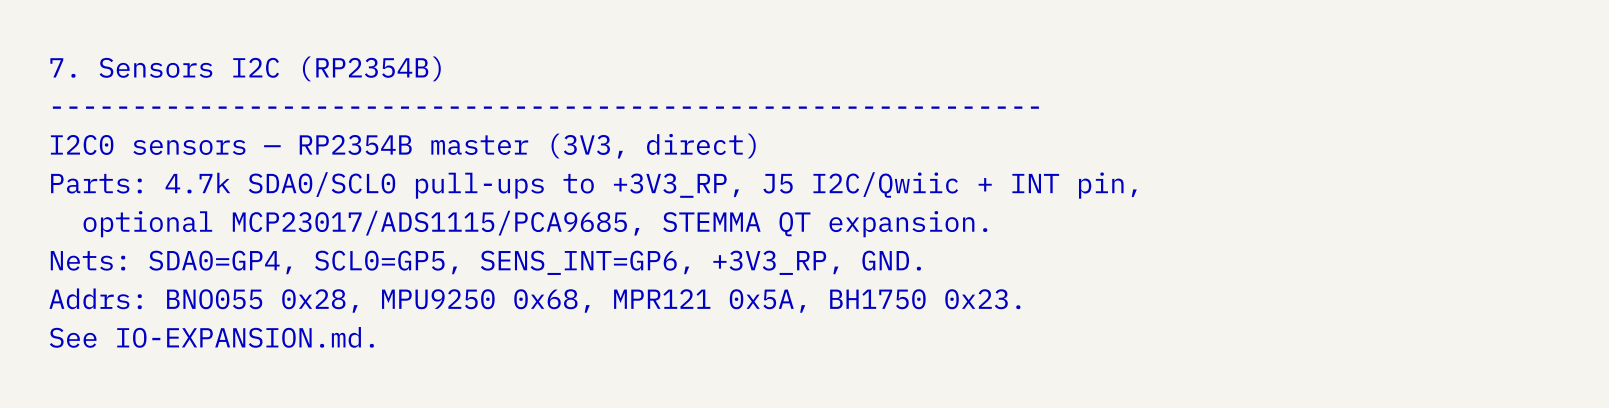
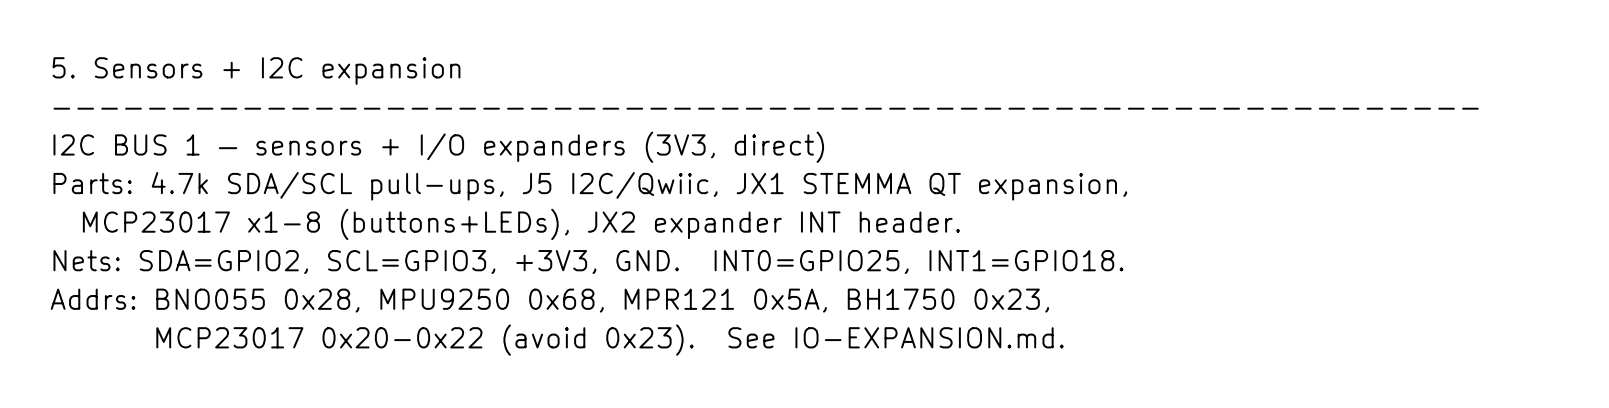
text: 7. Sensors I2C (RP2354B) (245, 68) -> 5. Sensors + I2C expansion (256, 71)
text: I2C0 sensors — RP2354B master (3V3, direct) (403, 146) -> I2C BUS 1 — sensors + I/O expanders (3V3, direct) (438, 147)
text: Parts: 4.7k SDA0/SCL0 pull-ups to +3V3_RP, J5 I2C/Qwiic + INT pin, (593, 185) -> Parts: 4.7k SDA/SCL pull-ups, J5 I2C/Qwiic, JX1 STEMMA QT expansion, (590, 186)
text: optional MCP23017/ADS1115/PCA9685, STEMMA QT expansion. (535, 224) -> MCP23017 x1-8 (buttons+LEDs), JX2 expander INT header. (521, 224)
text: Nets: SDA0=GP4, SCL0=GP5, SENS_INT=GP6, +3V3_RP, GND. (485, 262) -> Nets: SDA=GPIO2, SCL=GPIO3, +3V3, GND. INT0=GPIO25, INT1=GPIO18. (588, 262)
text: Addrs: BNO055 0x28, MPU9250 0x68, MPR121 0x5A, BH1750 0x23. (534, 300) -> Addrs: BNO055 0x28, MPU9250 0x68, MPR121 0x5A, BH1750 0x23, (549, 300)
text: See IO-EXPANSION.md. (211, 337) -> MCP23017 0x20-0x22 (avoid 0x23). See IO-EXPANSION.md. (610, 340)

